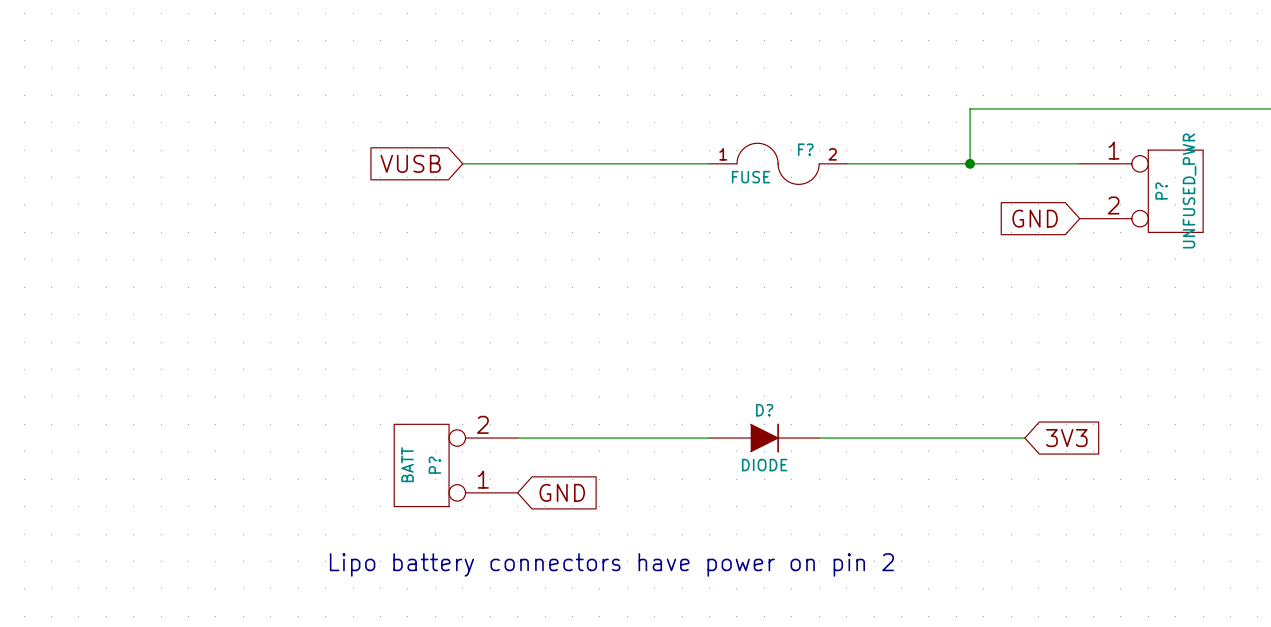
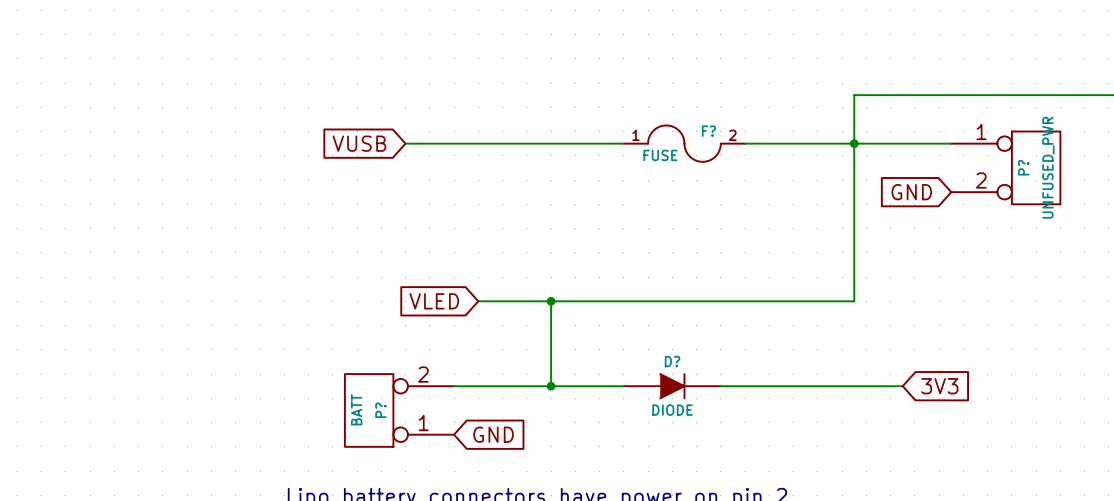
wire: none -> (854, 143) (854, 301) (478, 301)
global label: none -> VLED (434, 301)
wire: none -> (551, 301) (551, 386)
junction: none -> (551, 301)
junction: none -> (551, 386)

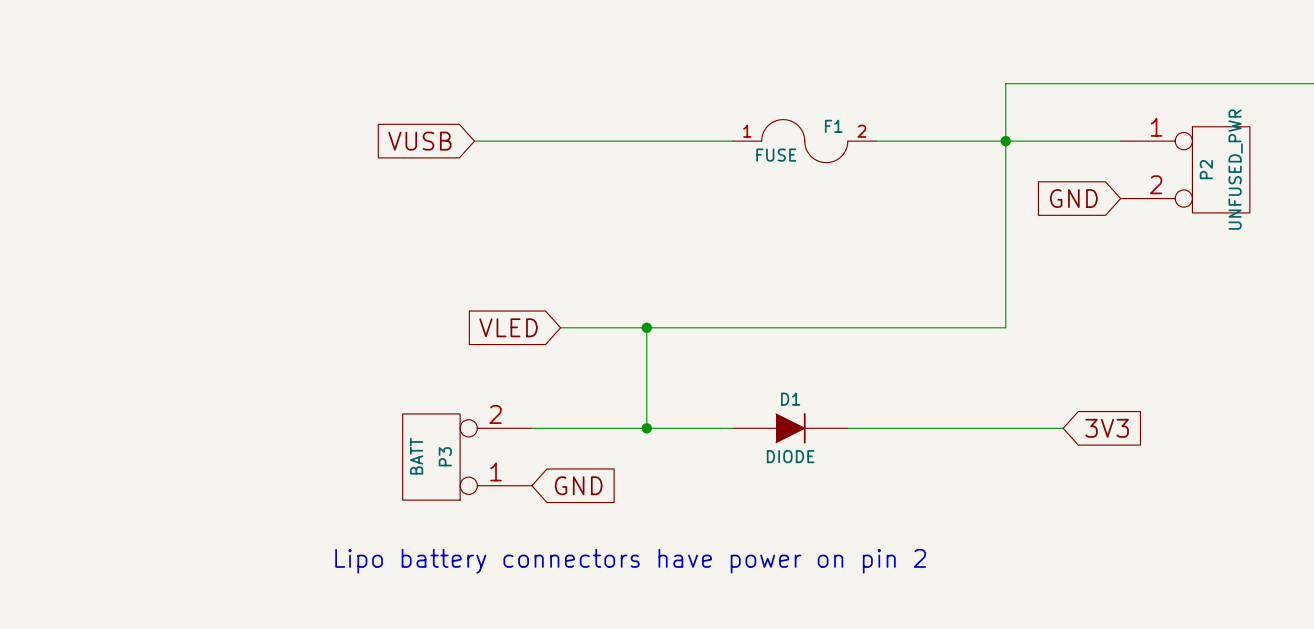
F? name: F? (708, 131) -> F1 (833, 126)
P? name: P? (1023, 167) -> P2 (1206, 169)
D? name: D? (672, 361) -> D1 (790, 399)
P? name: P? (380, 410) -> P3 (445, 456)

